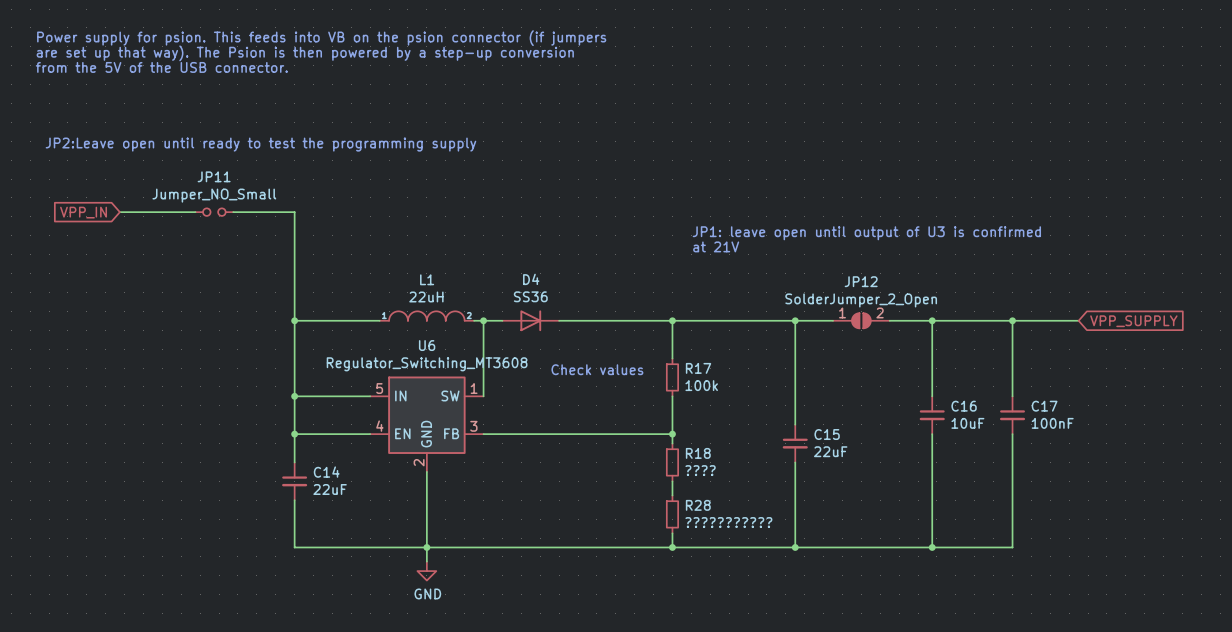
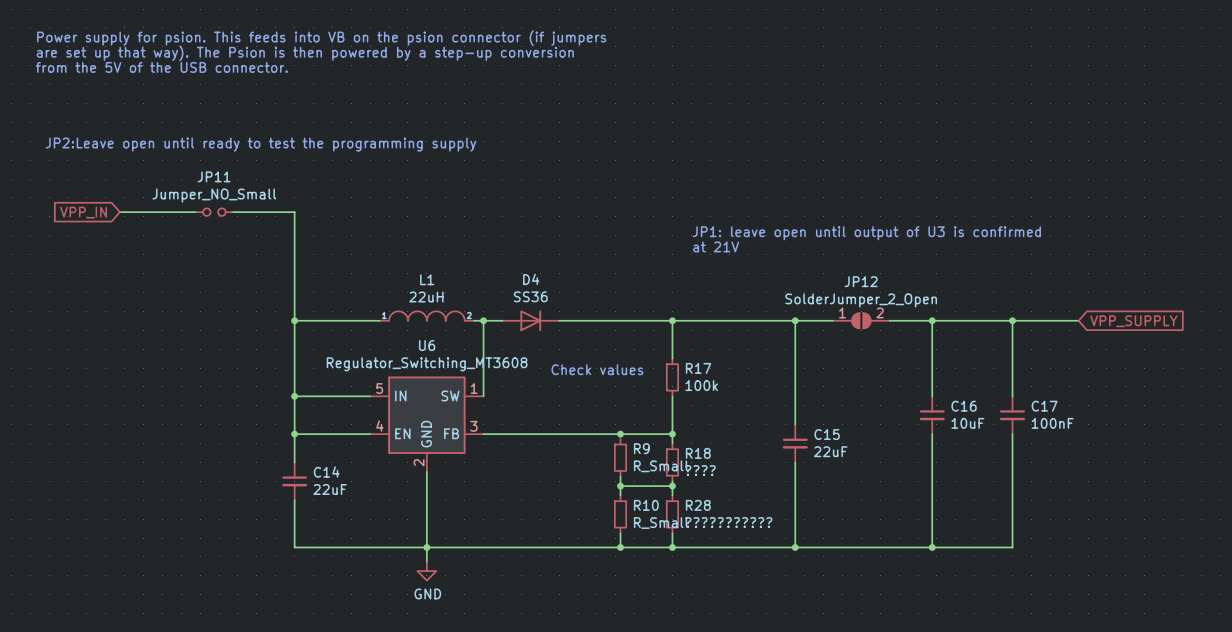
junction: none -> (620, 434)
R9: none -> R_Small (620, 457)
wire: none -> (620, 476) (620, 495)
wire: none -> (620, 486) (672, 486)
junction: none -> (620, 486)
junction: none -> (672, 486)
R10: none -> R_Small (620, 514)
wire: none -> (620, 533) (620, 547)
junction: none -> (620, 547)

